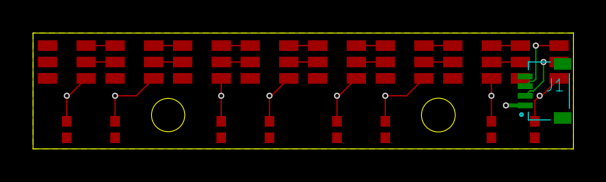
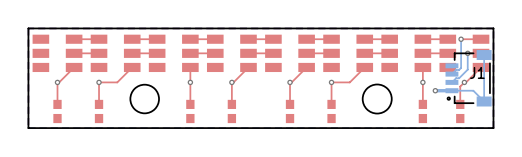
bottom track: none -> (484, 55) (484, 101) (473, 90) (451, 90)

